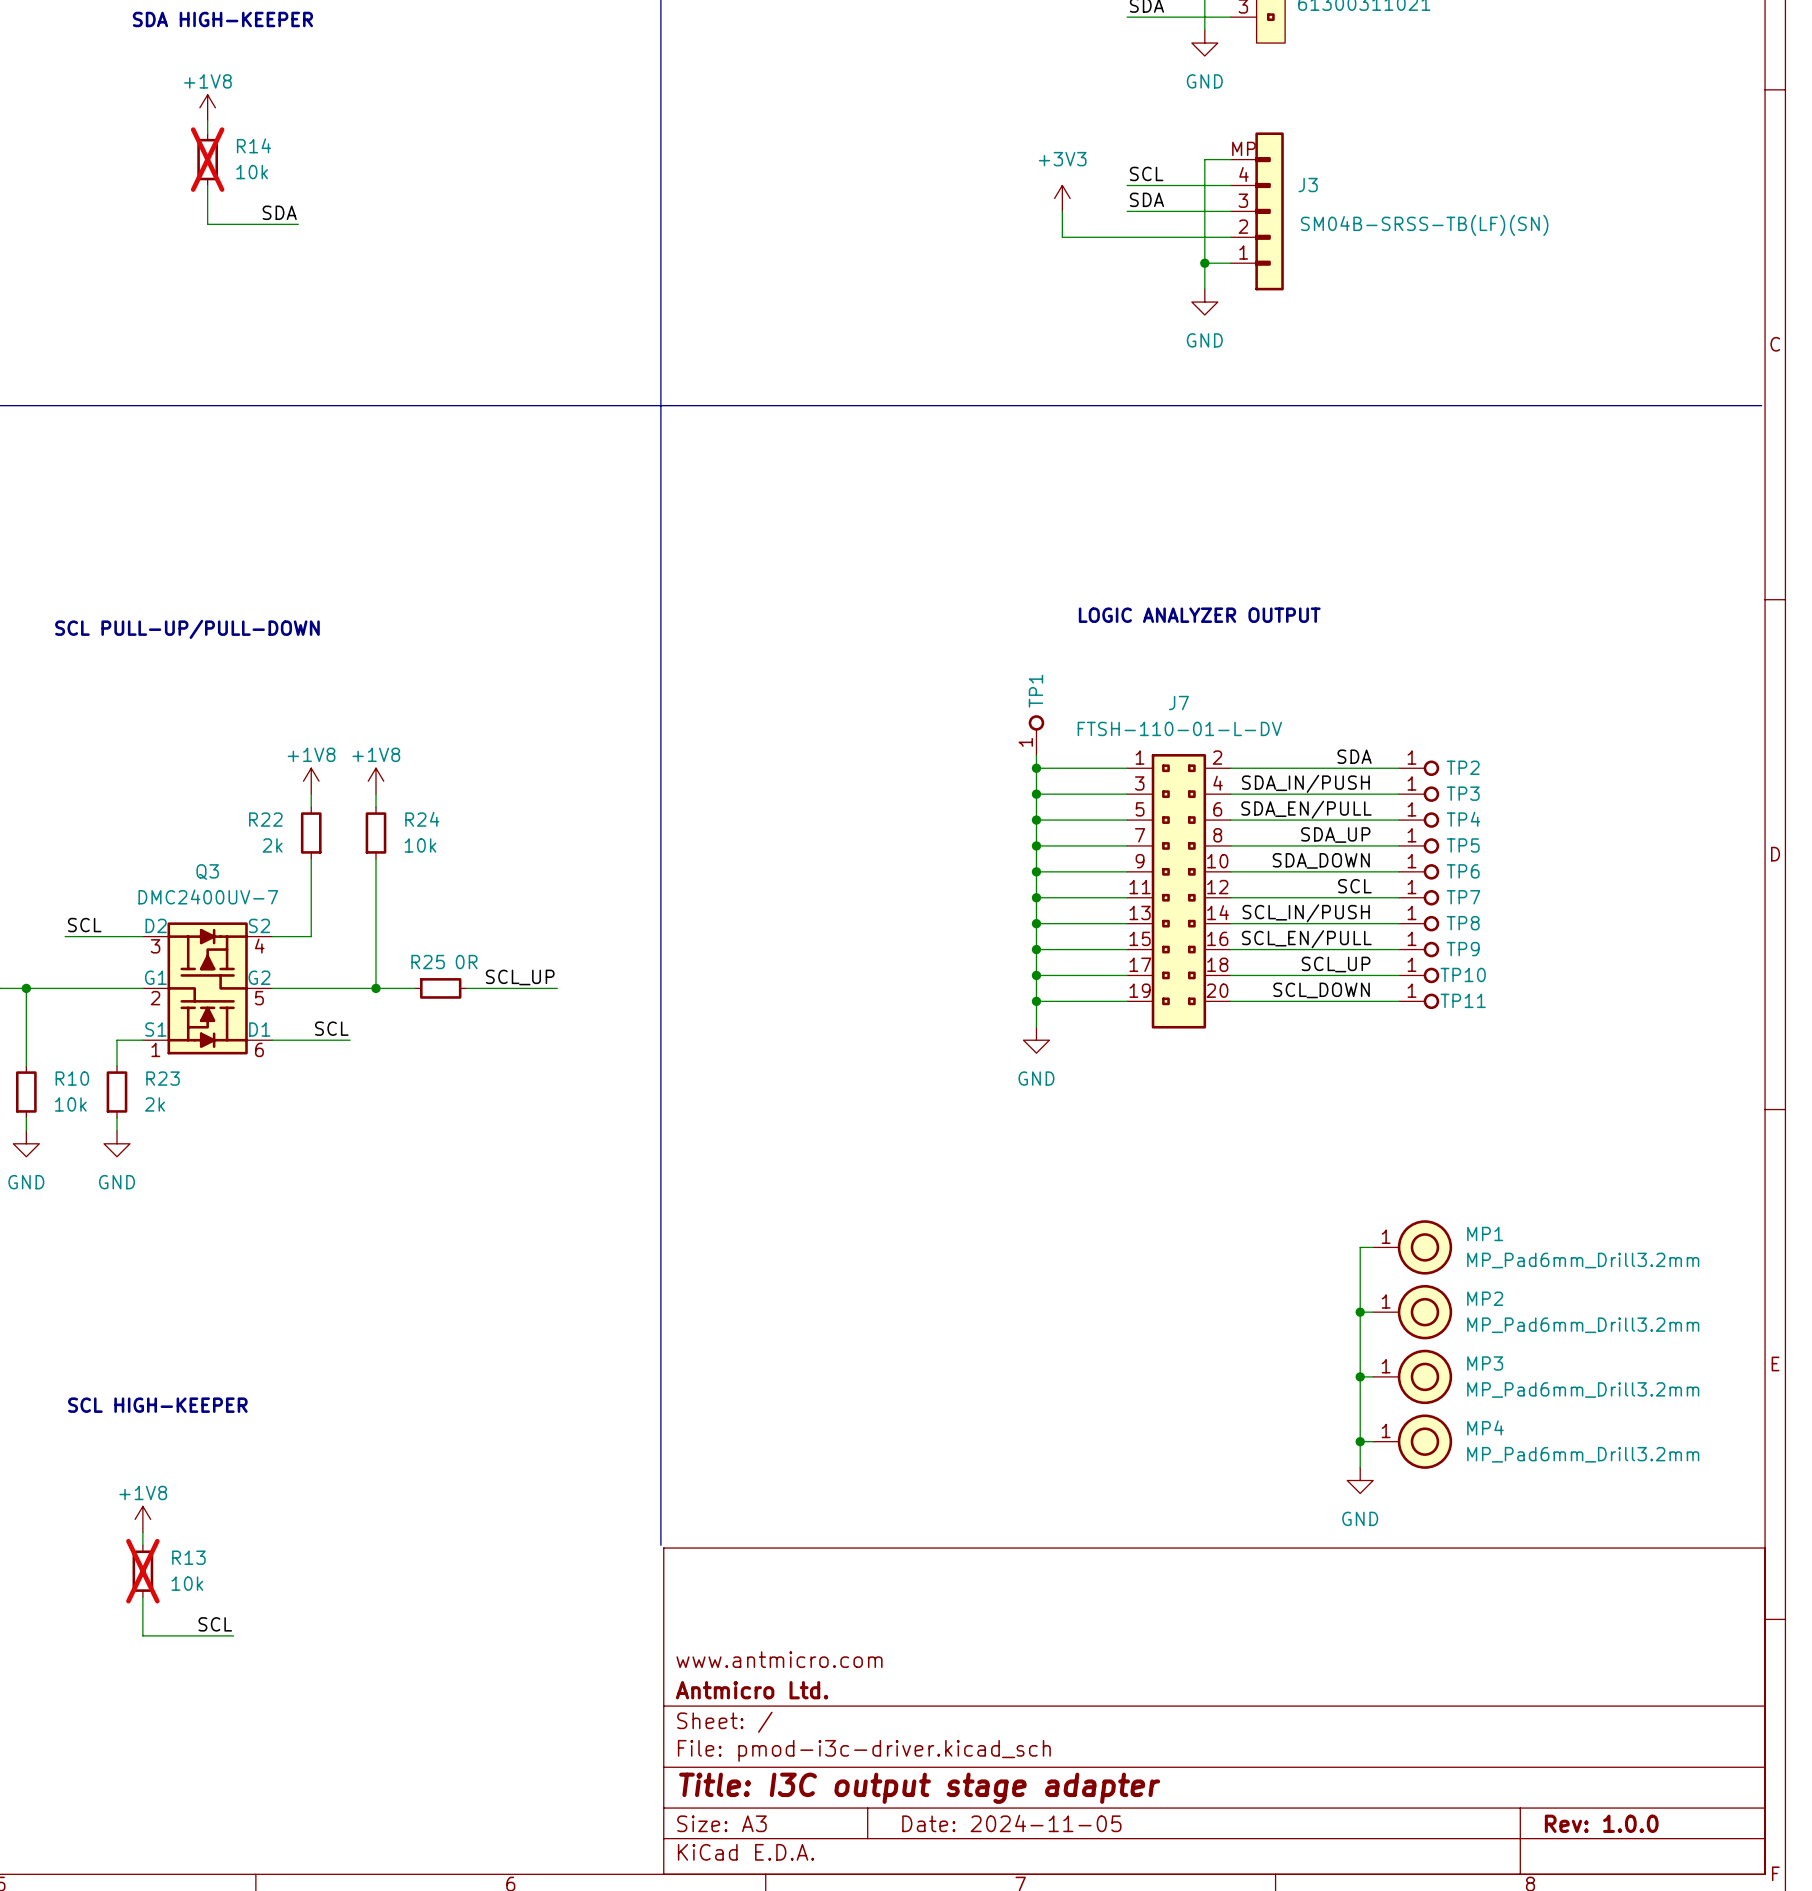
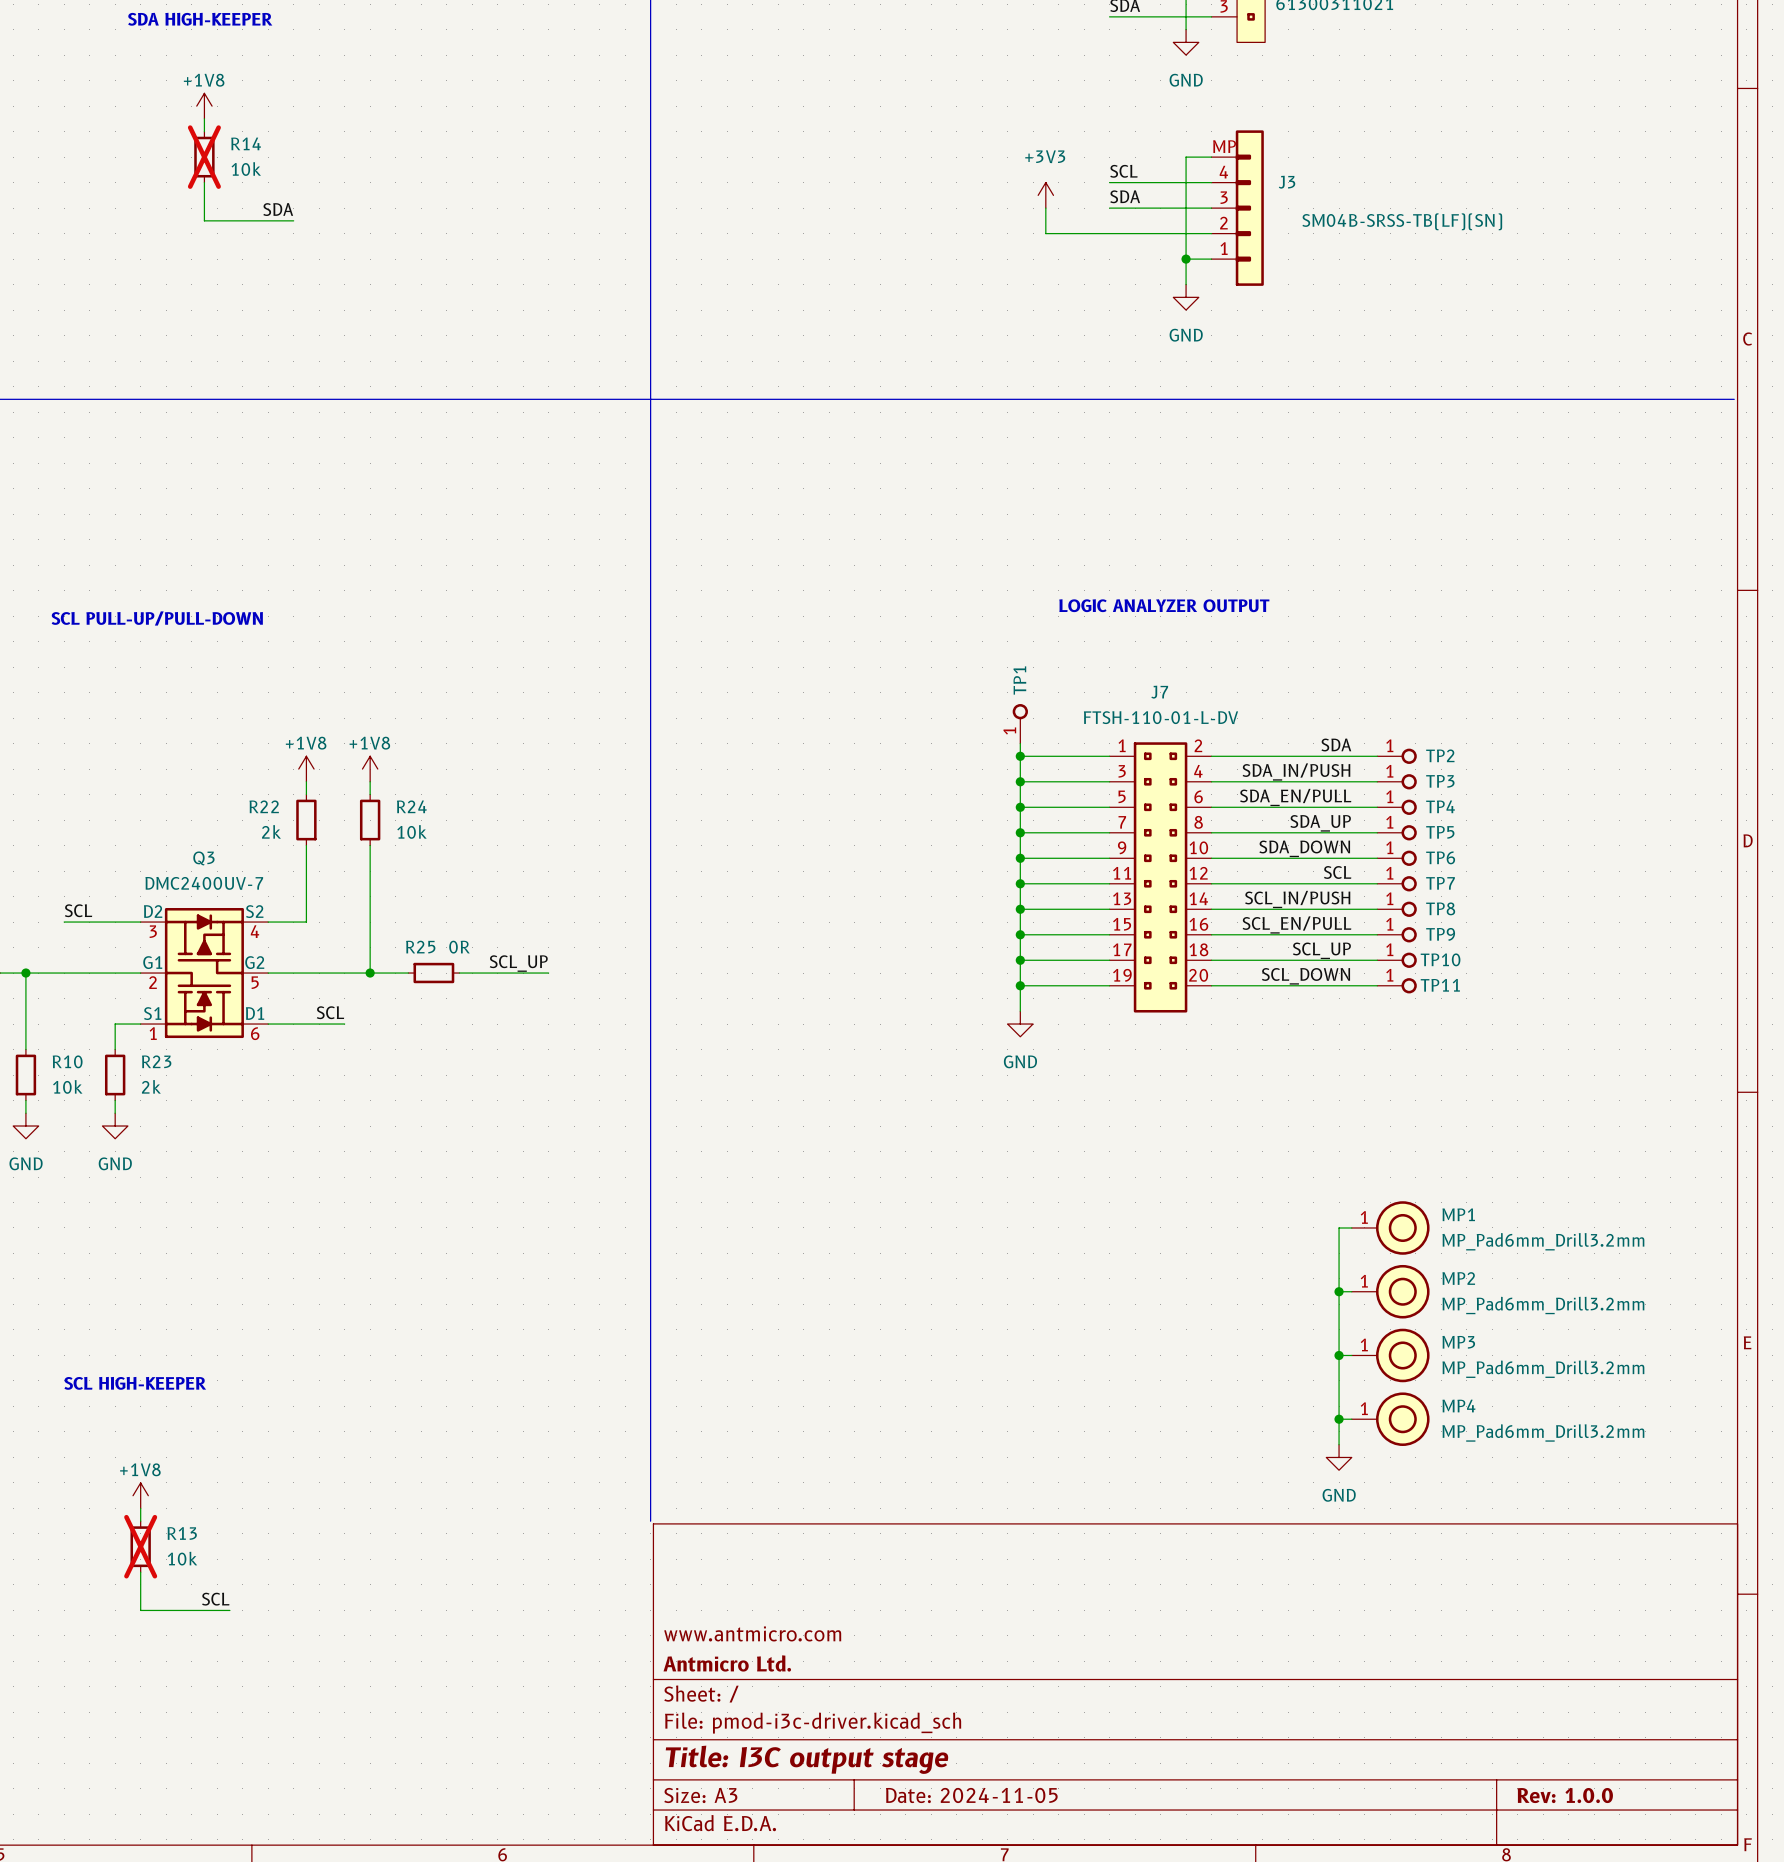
title block: Title: I3C output stage adapter (919, 1788) -> Title: I3C output stage (807, 1759)

